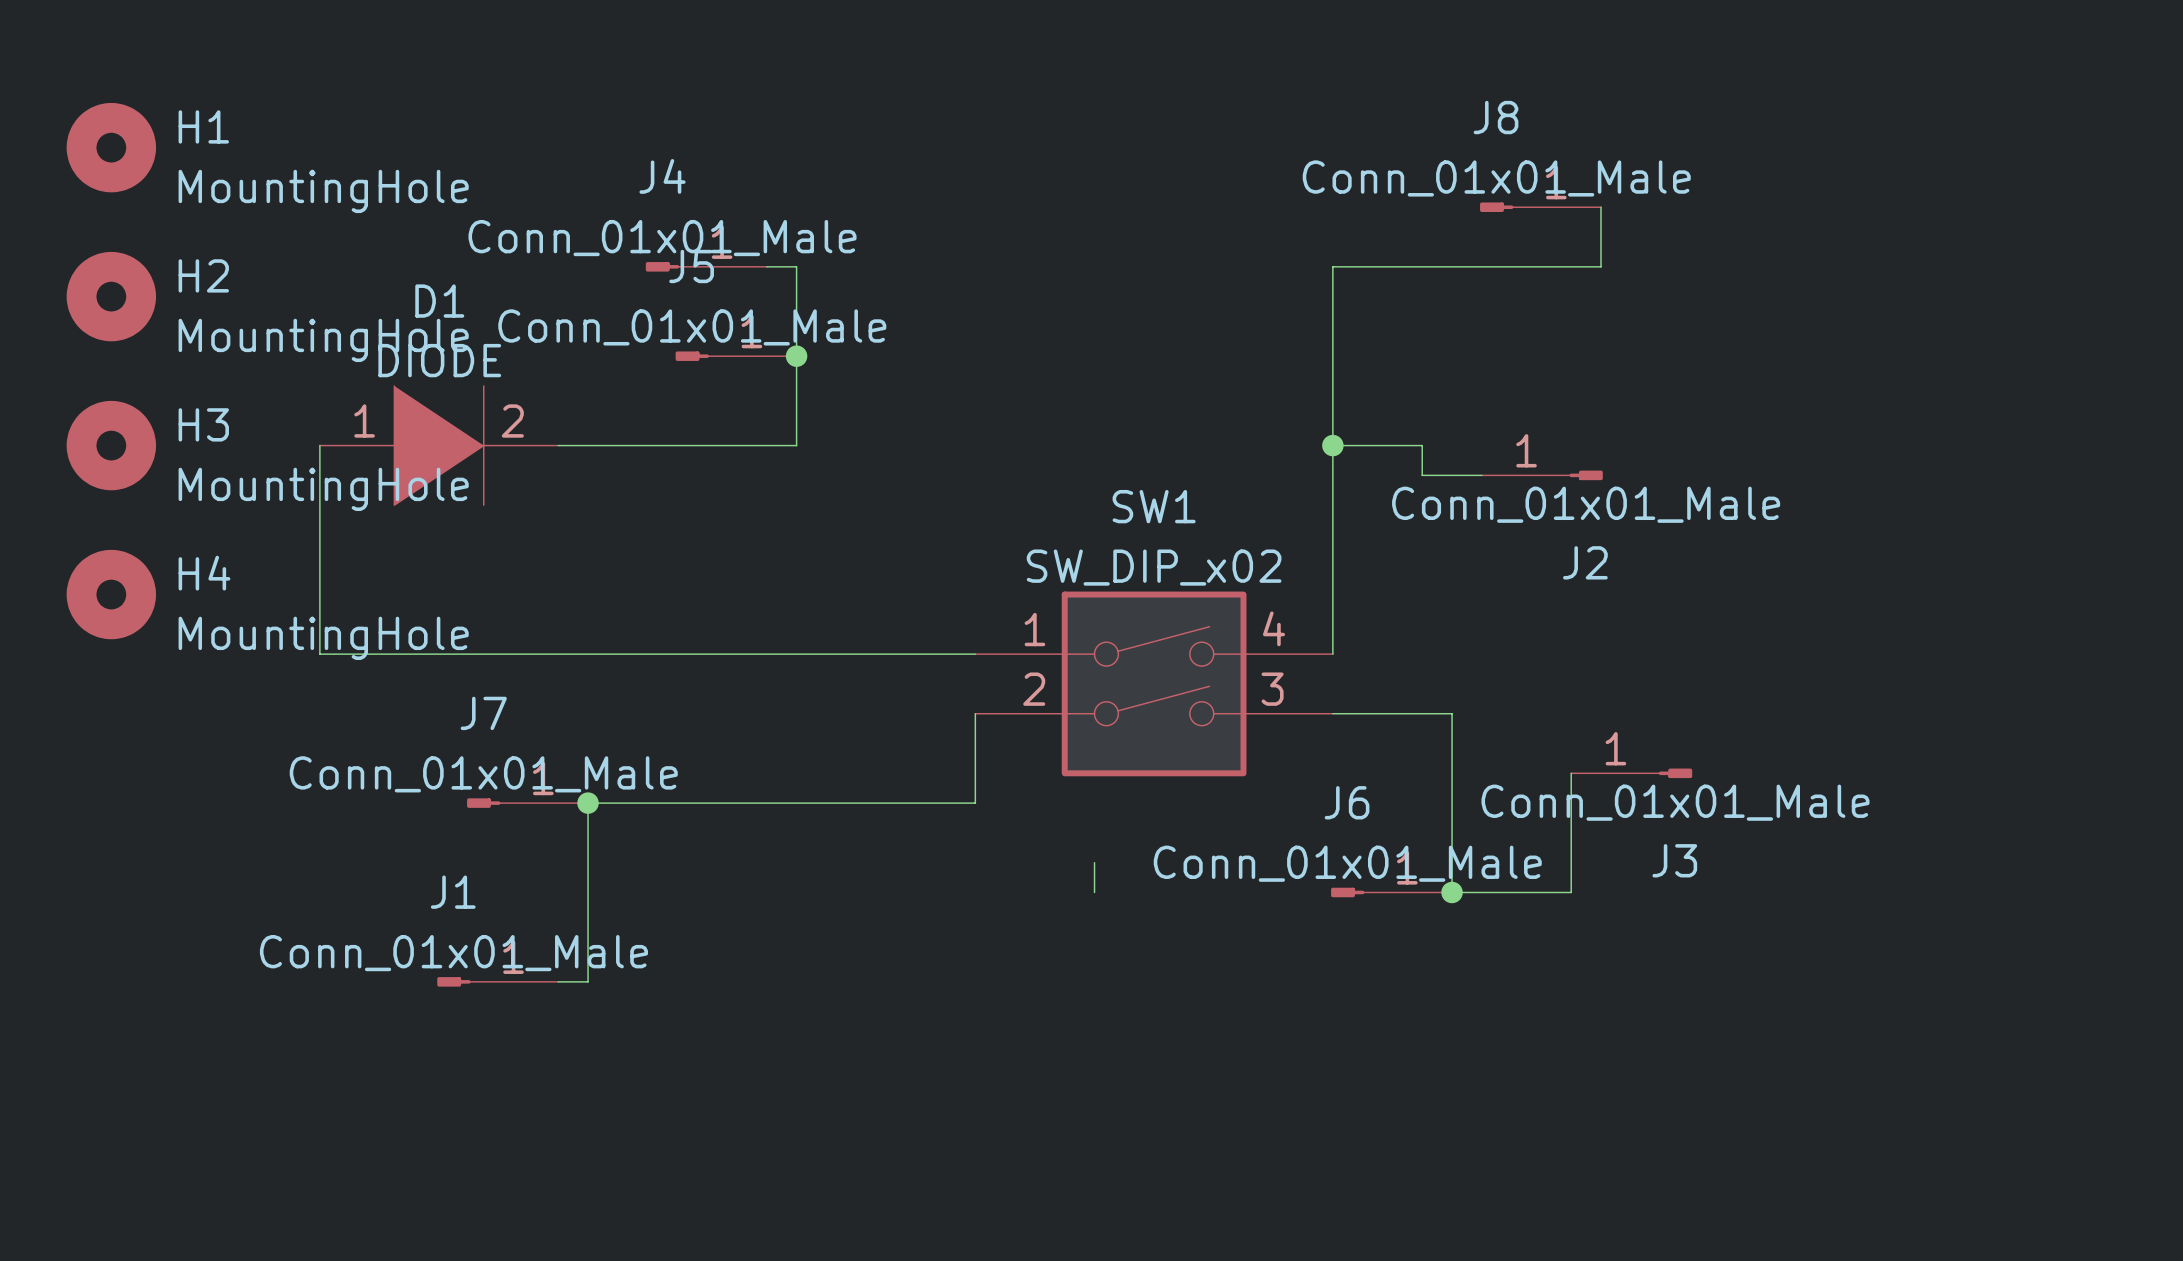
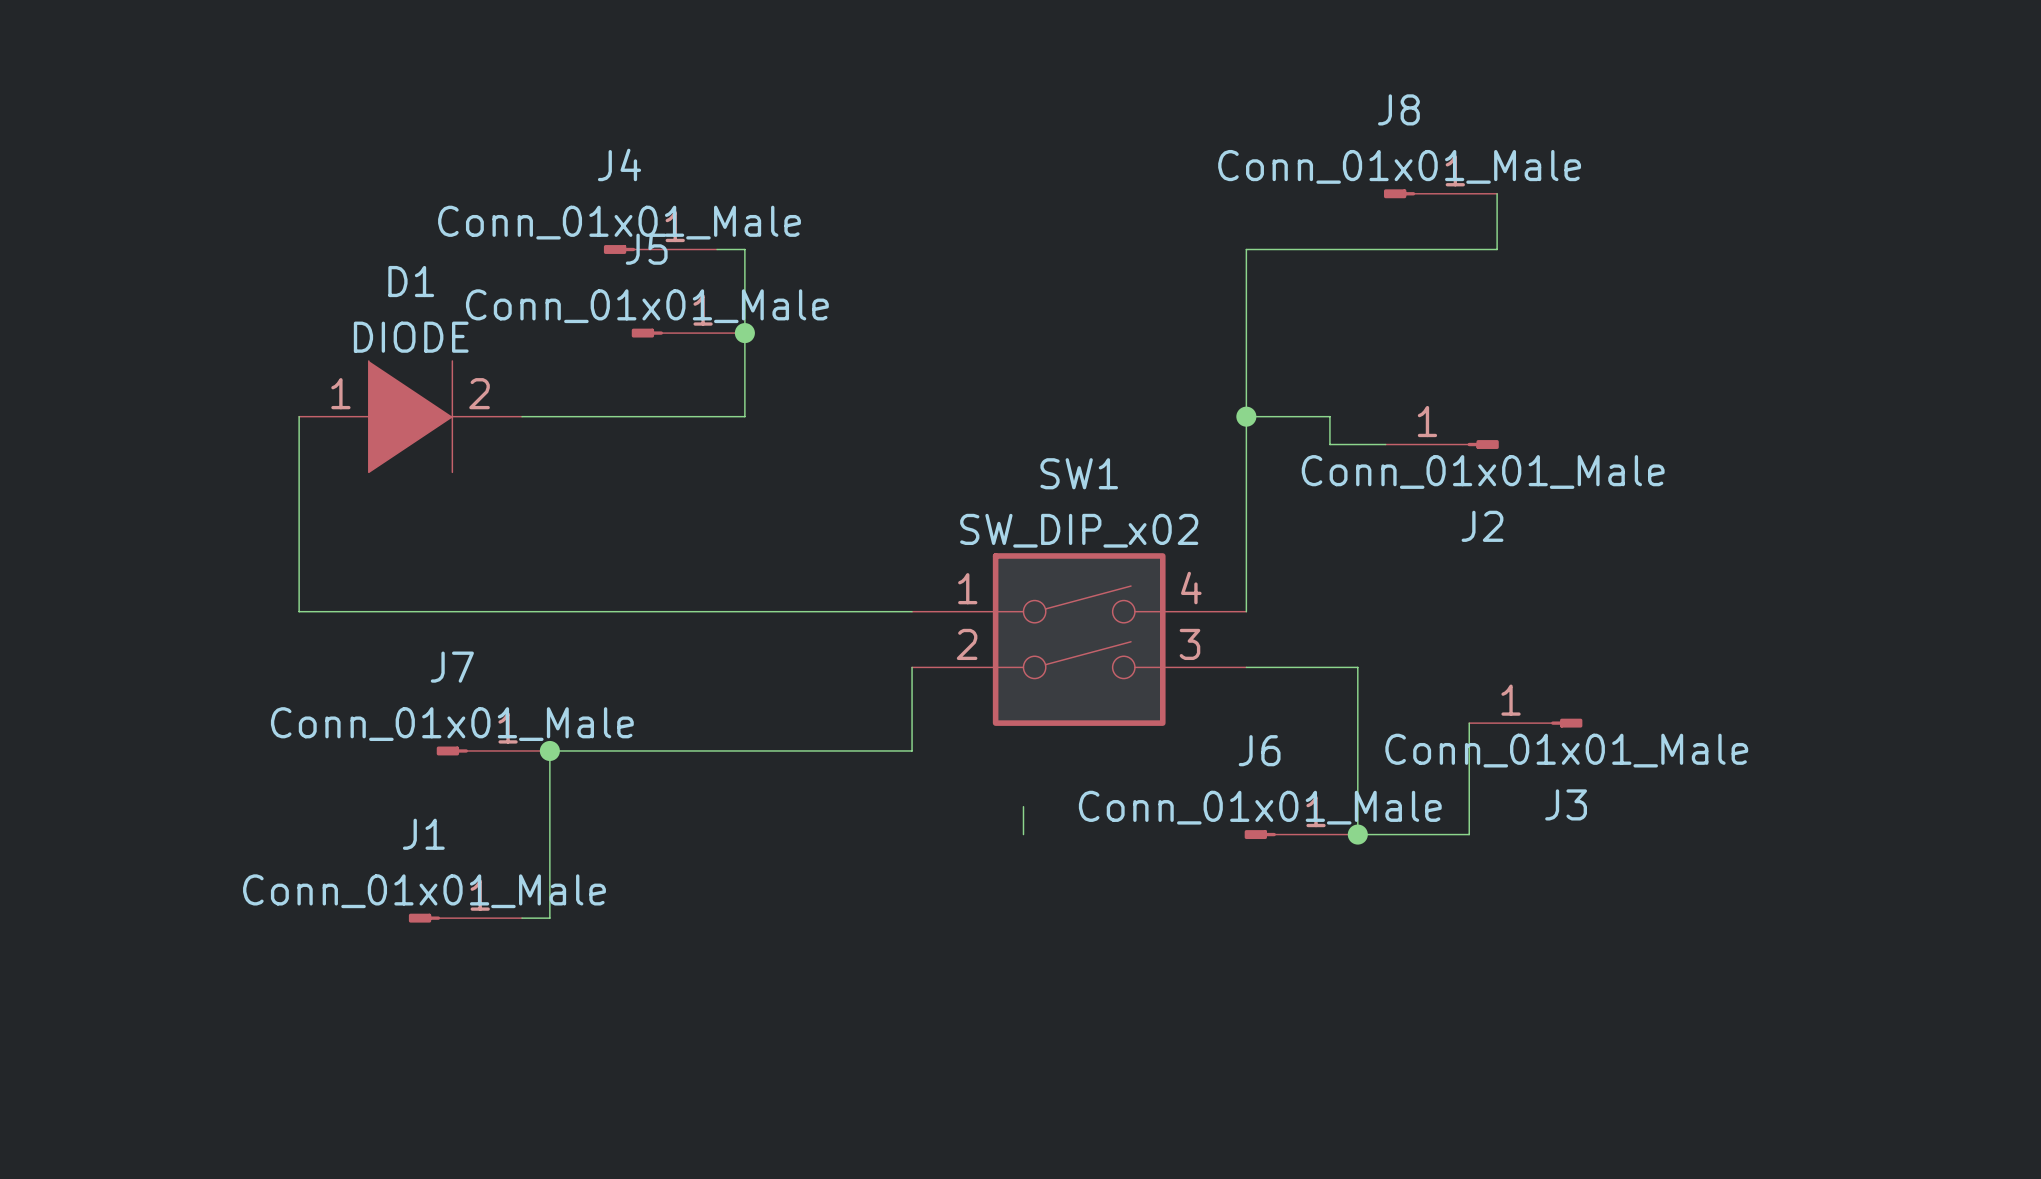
H1: MountingHole (111, 147) -> none
H2: MountingHole (111, 296) -> none
H3: MountingHole (111, 445) -> none
H4: MountingHole (111, 594) -> none

